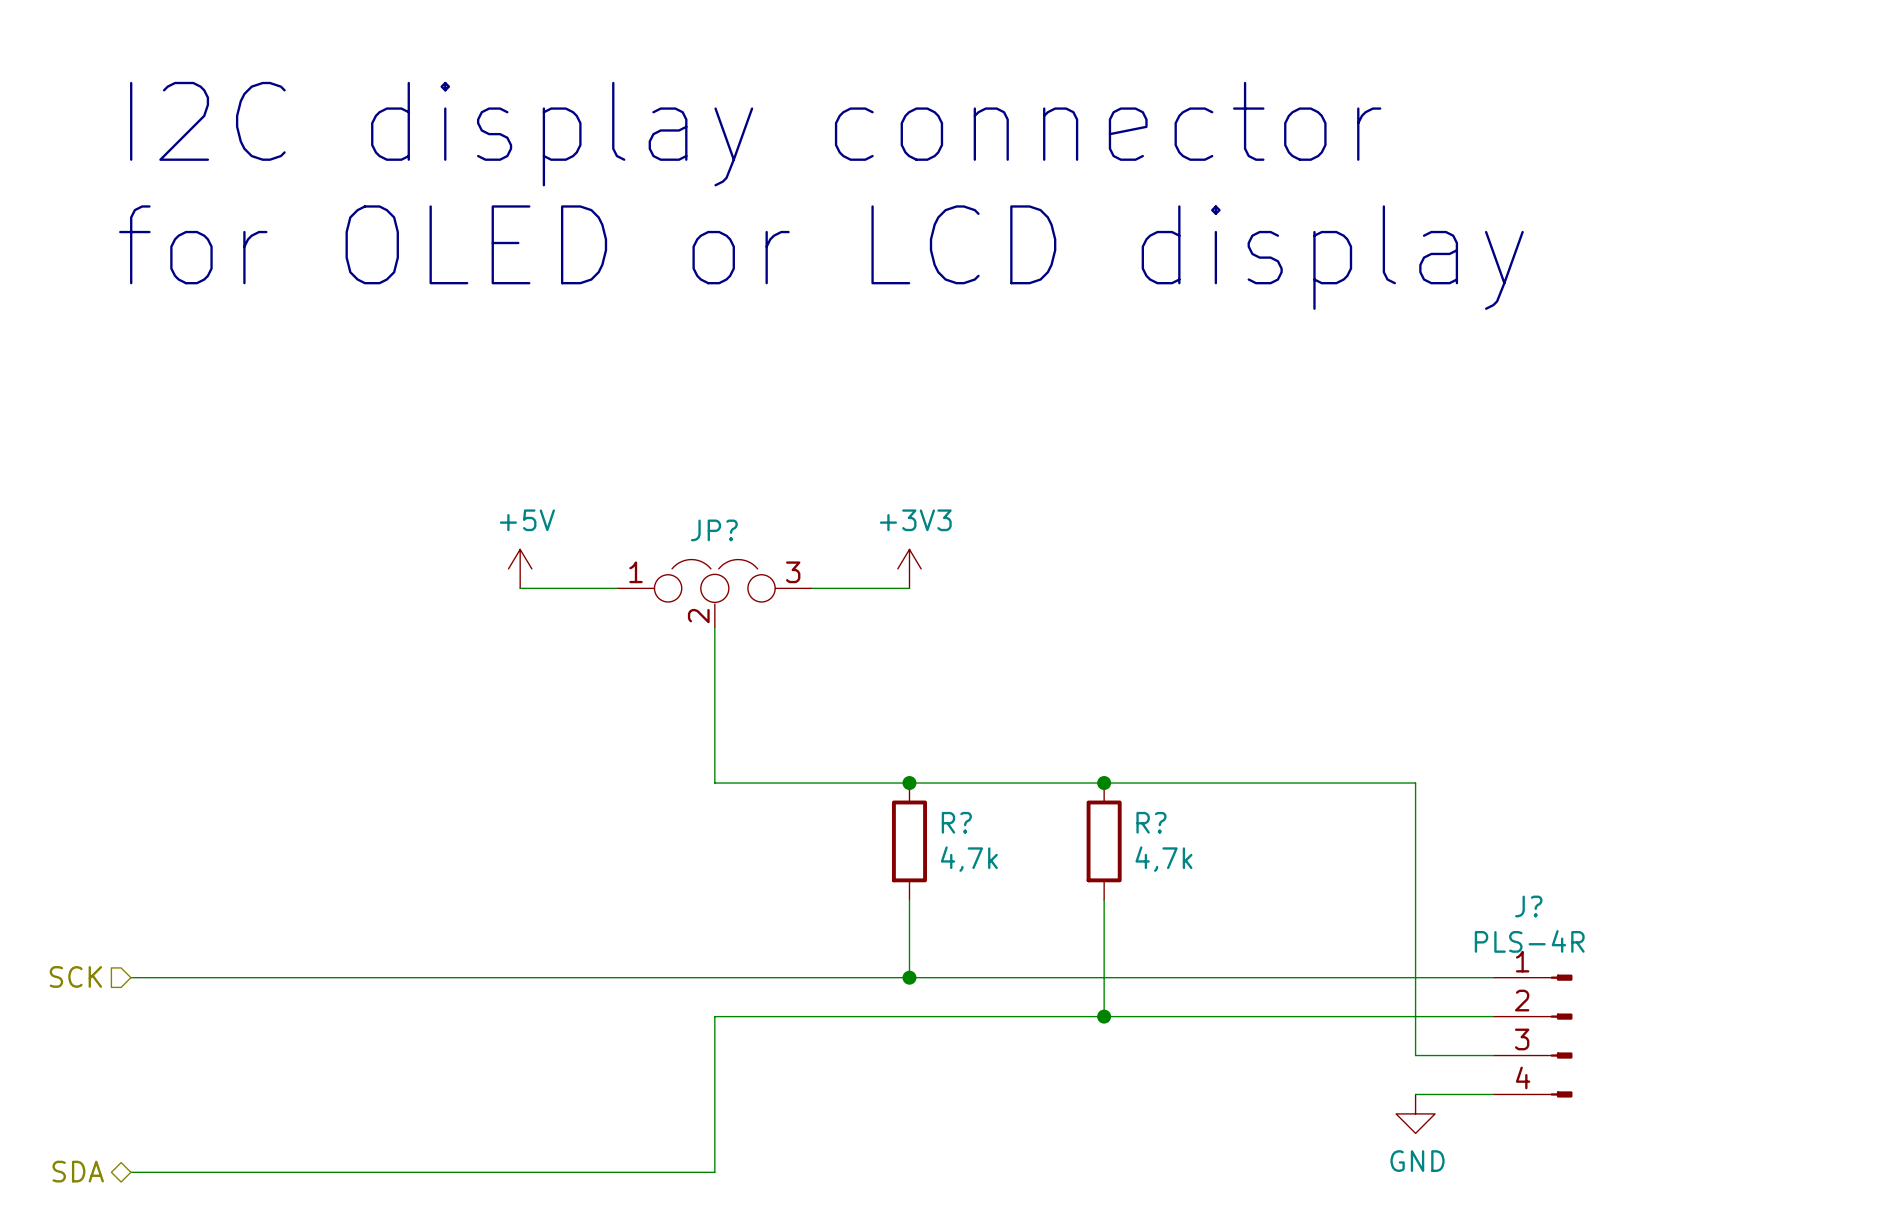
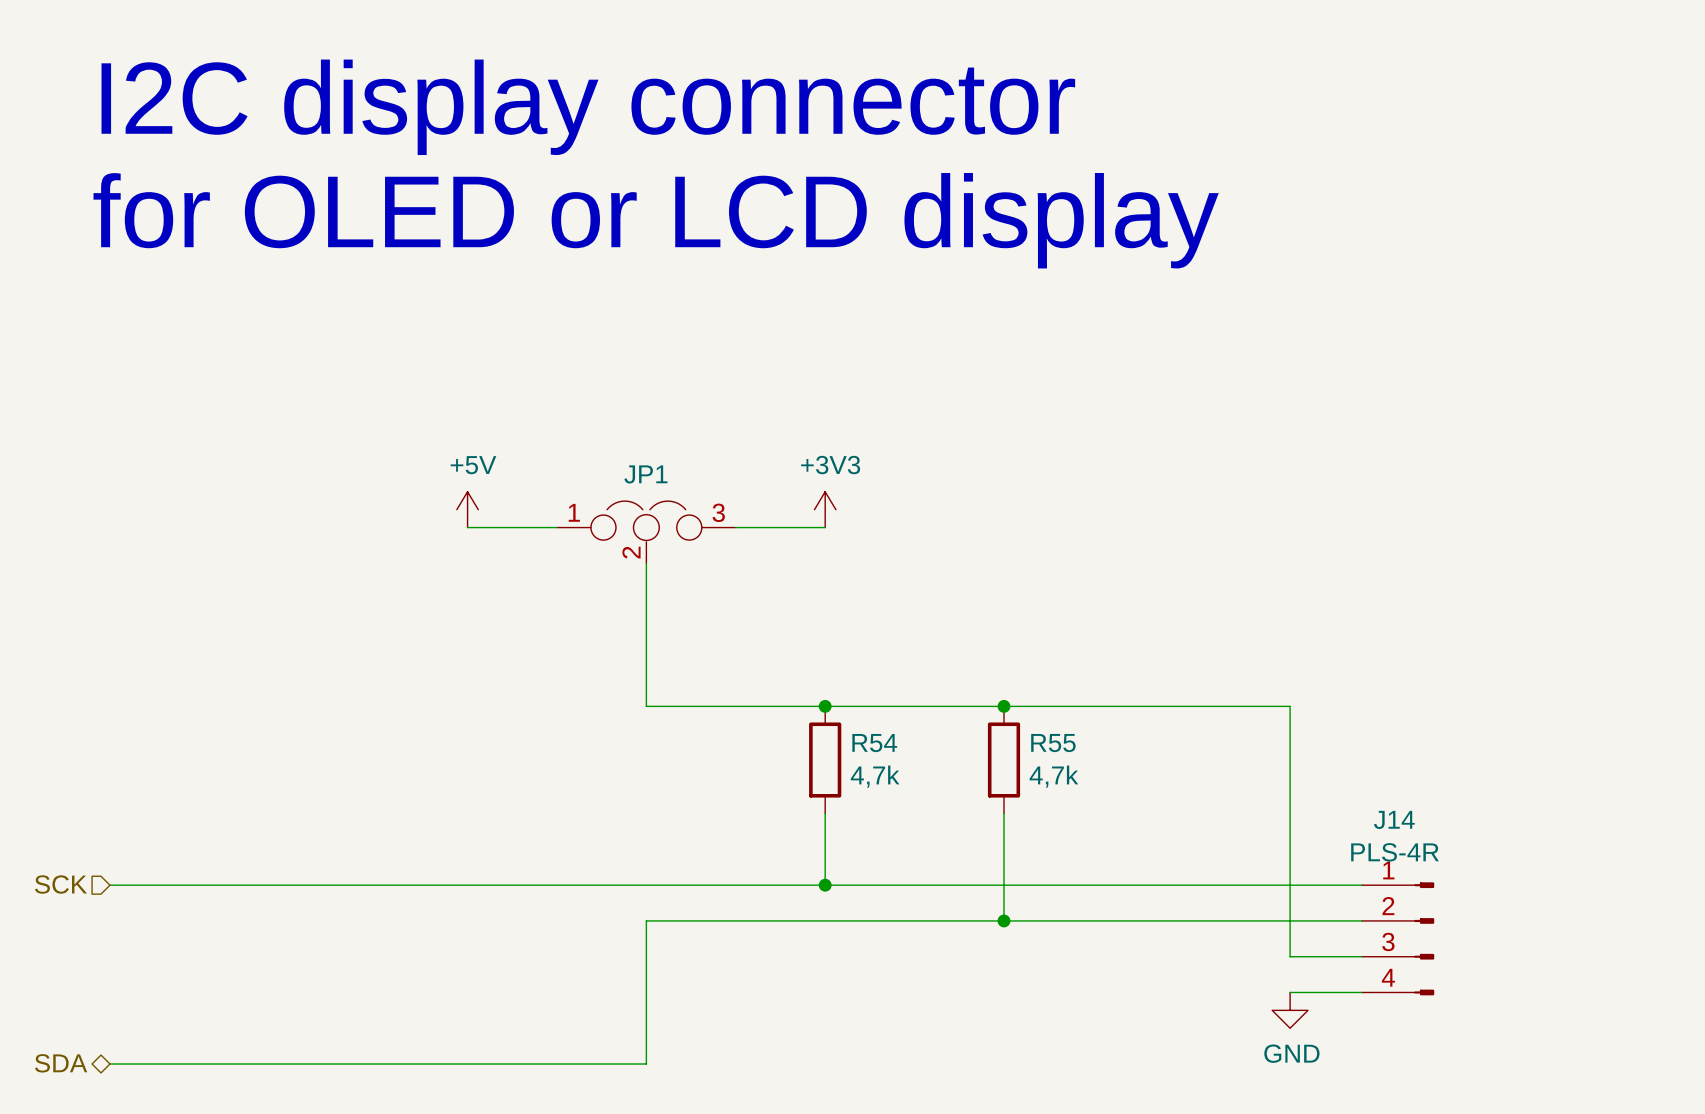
JP? name: JP? (714, 530) -> JP1 (645, 474)
R? name: R? (956, 822) -> R54 (874, 743)
R? name: R? (1151, 822) -> R55 (1053, 743)
J? name: J? (1528, 906) -> J14 (1394, 819)

